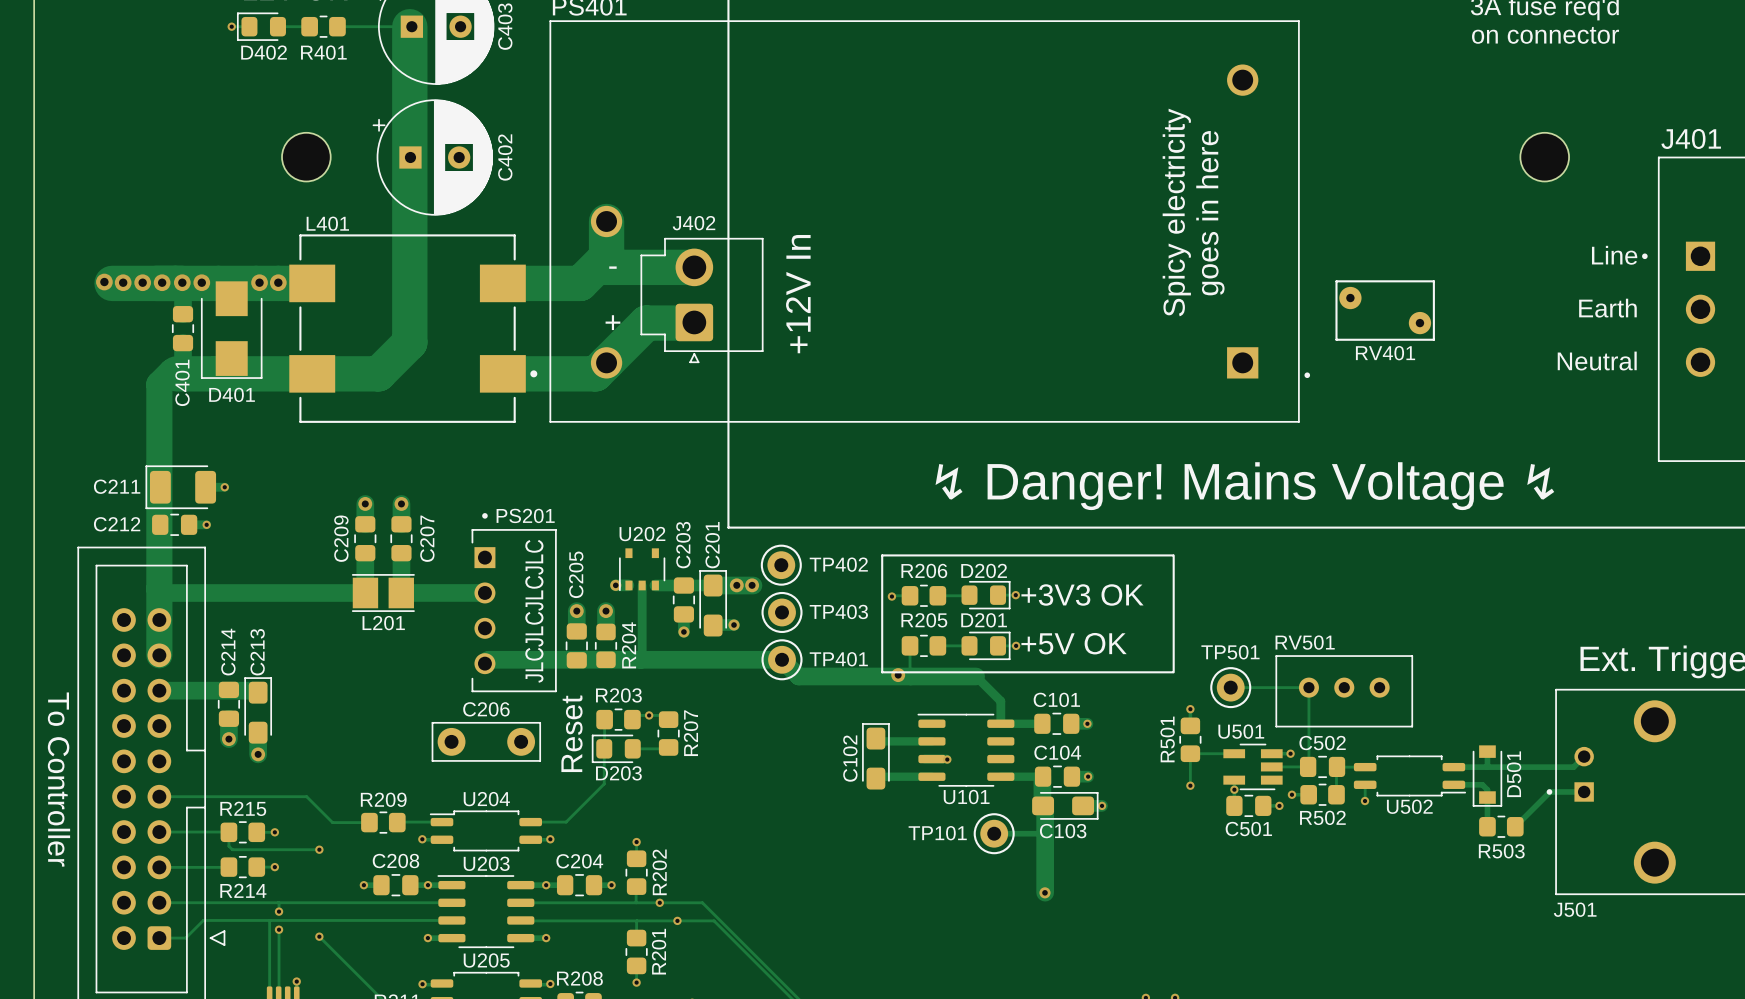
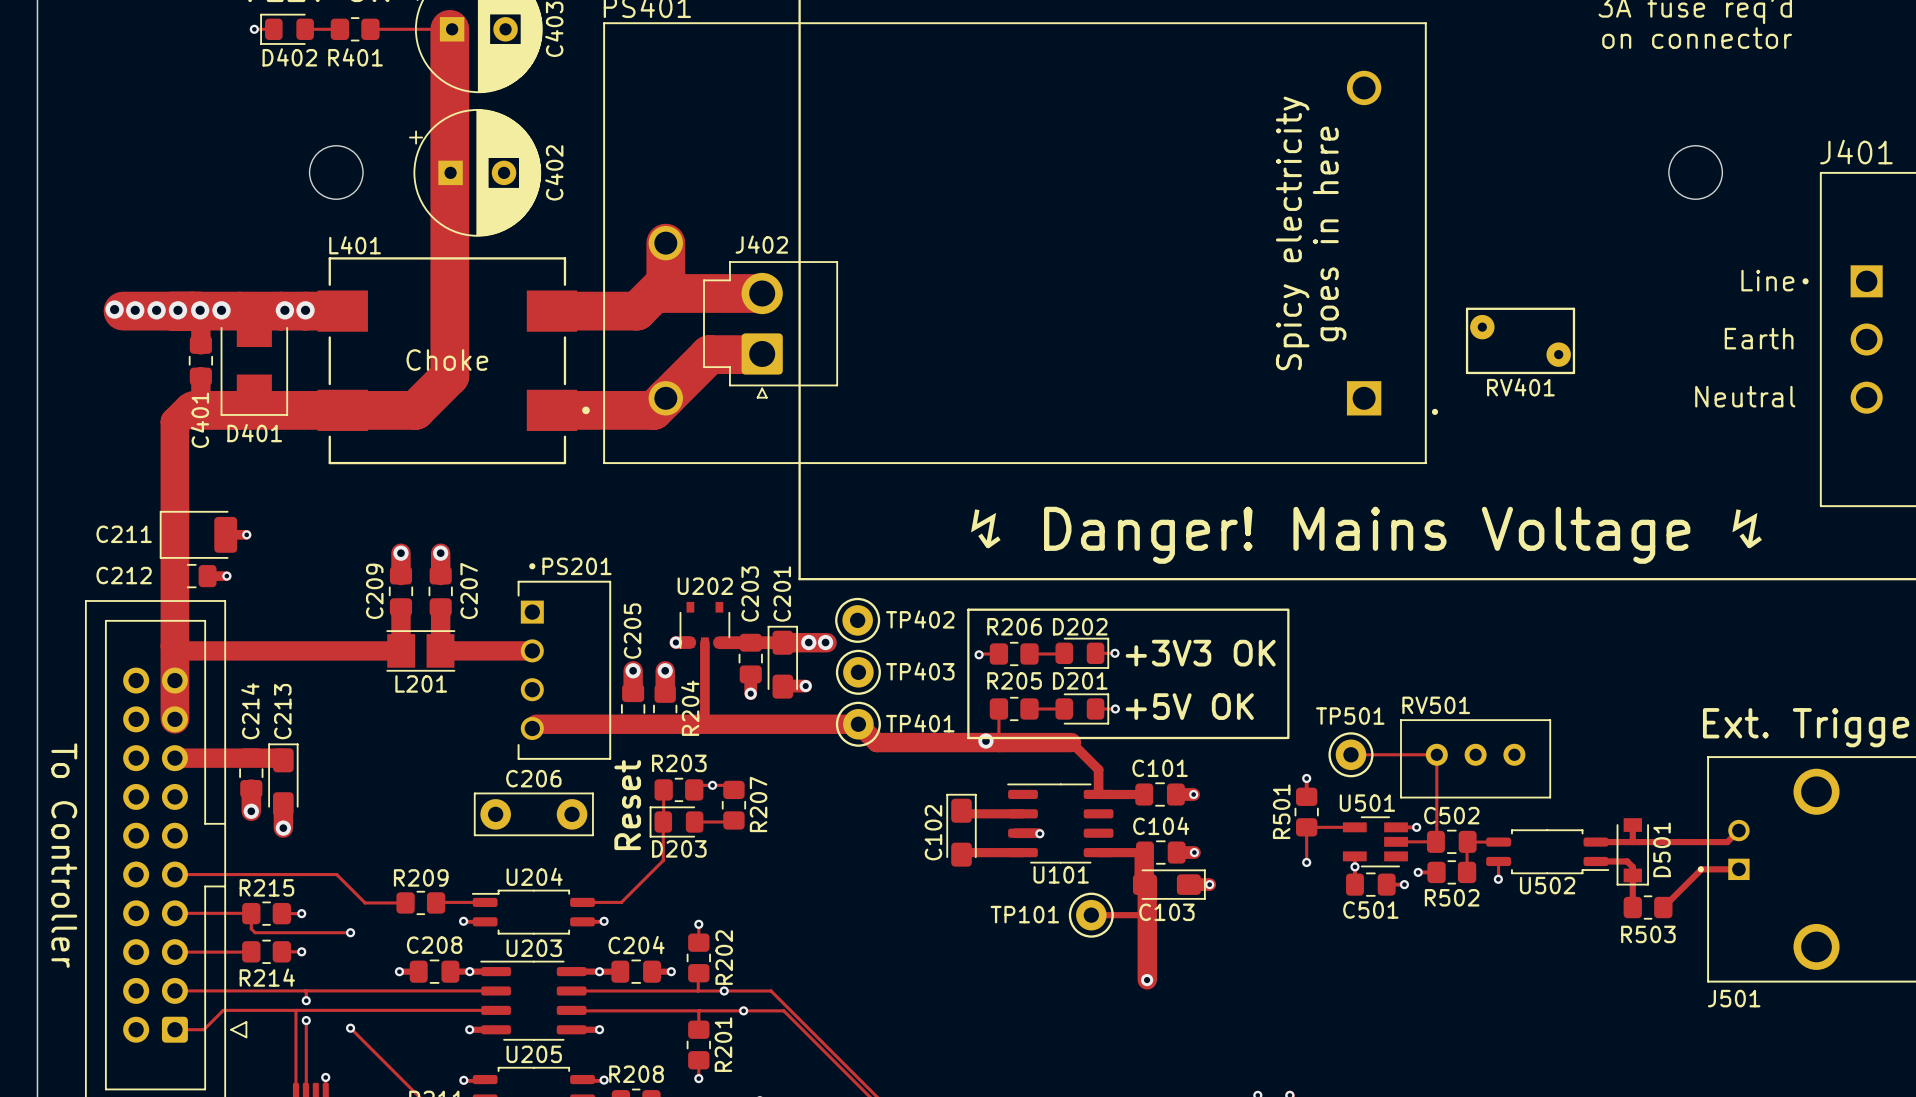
text: - (612, 267) -> none
text: +12V In (798, 294) -> none
text: + (612, 322) -> none
L401 value: none -> Choke (447, 360)
text: JLCJLCJLCJLC (534, 611) -> none

